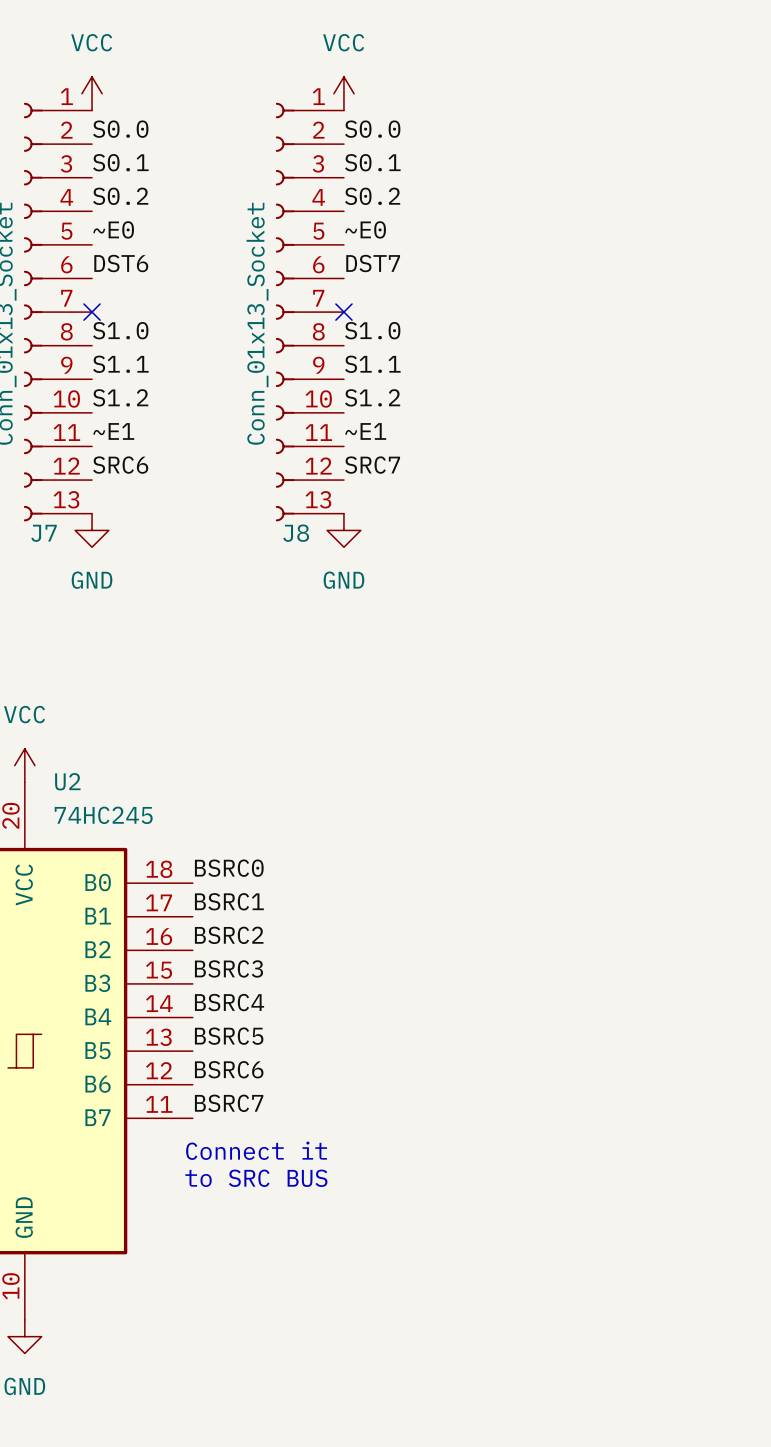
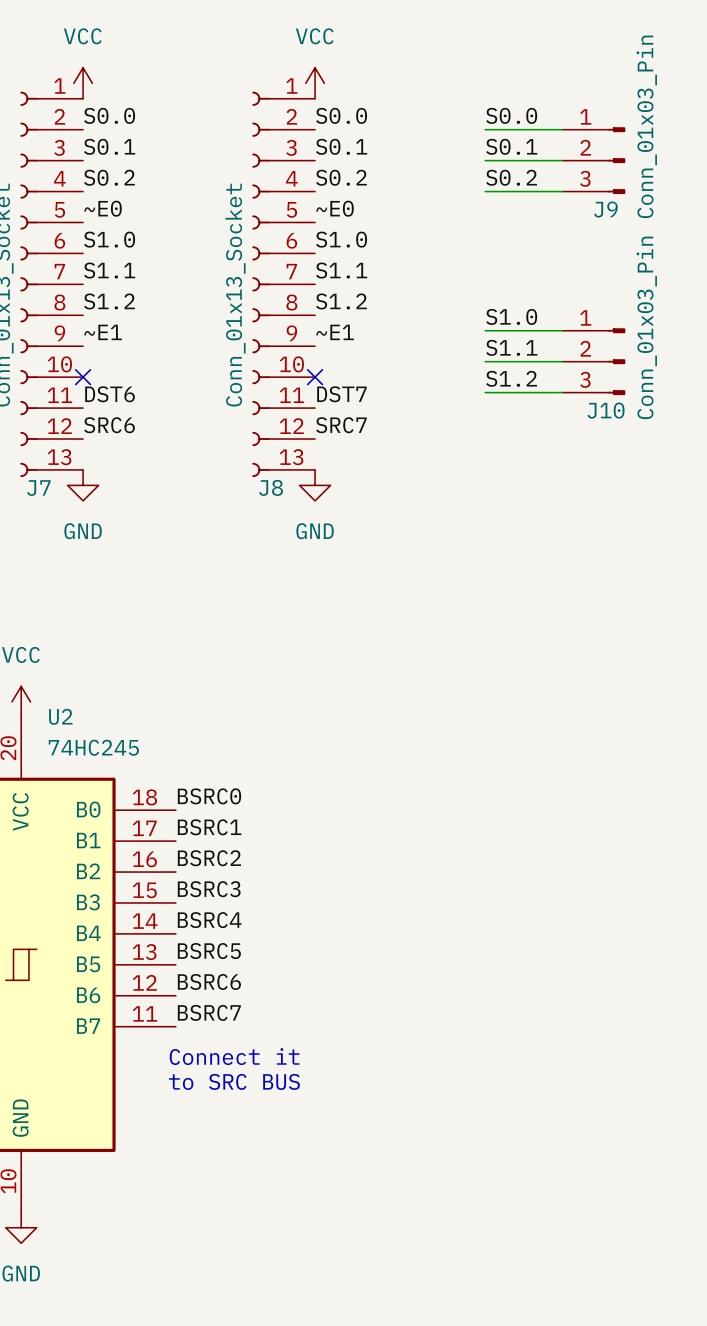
label: none -> S0.0 (511, 115)
wire: none -> (485, 129) (562, 129)
label: none -> S0.1 (511, 146)
wire: none -> (485, 160) (562, 160)
J9: none -> Conn_01x03_Pin (593, 160)
label: none -> S0.2 (511, 177)
wire: none -> (485, 191) (562, 191)
label: DST6 (121, 263) -> S1.0 (109, 239)
label: DST7 (373, 263) -> S1.0 (341, 239)
label: none -> S1.1 (109, 270)
label: none -> S1.1 (341, 270)
no-connect mark: (92, 312) -> none
no-connect mark: (343, 312) -> none
label: S1.0 (120, 330) -> S1.2 (109, 301)
label: S1.0 (372, 330) -> S1.2 (341, 301)
label: none -> S1.0 (511, 316)
wire: none -> (485, 330) (562, 330)
label: S1.1 (120, 364) -> ~E1 (103, 332)
label: S1.1 (372, 364) -> ~E1 (335, 332)
label: none -> S1.1 (511, 347)
wire: none -> (485, 361) (562, 361)
J10: none -> Conn_01x03_Pin (593, 361)
label: S1.2 (120, 397) -> none
label position: S1.2 (372, 397) -> S1.2 (511, 378)
no-connect mark: none -> (83, 377)
no-connect mark: none -> (315, 377)
wire: none -> (485, 392) (562, 392)
label: ~E1 (113, 431) -> DST6 (110, 394)
label: ~E1 (365, 431) -> DST7 (341, 394)

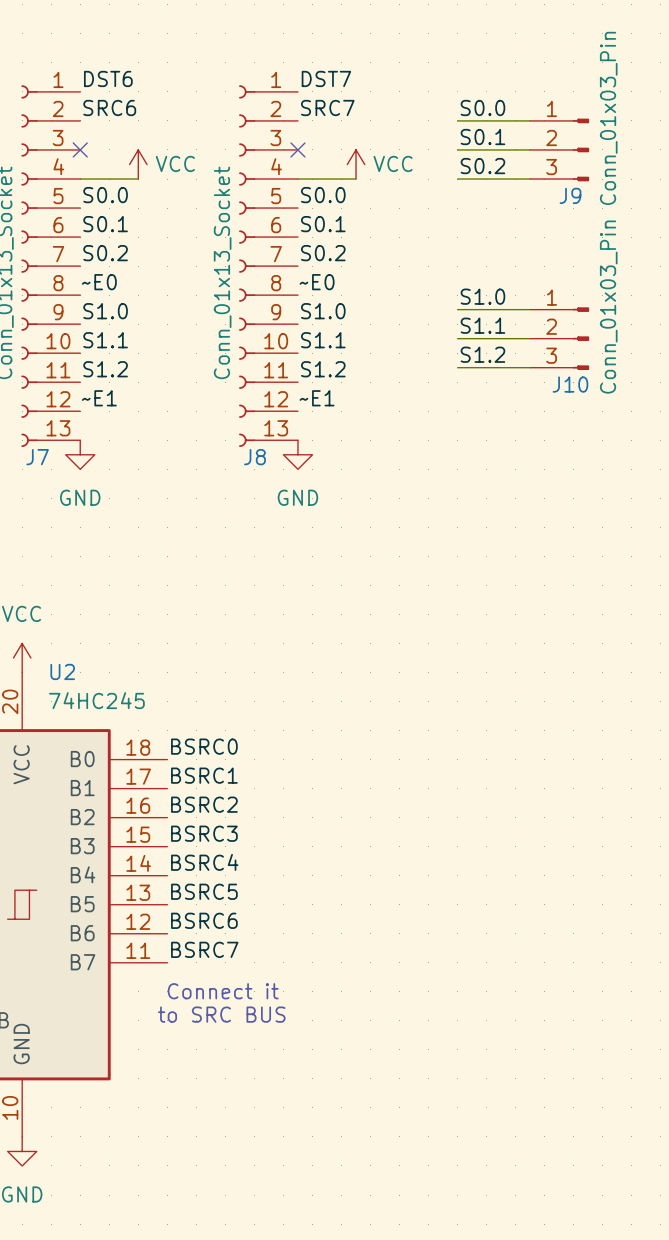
power symbol: VCC (83, 83) -> none
power symbol: VCC (315, 83) -> none
label: none -> DST6 (108, 78)
label: none -> DST7 (326, 78)
label: S0.0 (109, 115) -> SRC6 (109, 107)
label: S0.0 (341, 115) -> SRC7 (327, 107)
label: S0.1 (109, 146) -> none
label: S0.1 (341, 146) -> none
no-connect mark: none -> (80, 149)
no-connect mark: none -> (297, 149)
power symbol: none -> VCC (138, 164)
power symbol: none -> VCC (356, 164)
label: S0.2 (109, 177) -> none
label: S0.2 (341, 177) -> none
wire: none -> (80, 179) (138, 179)
wire: none -> (297, 179) (356, 179)
label: ~E0 (102, 208) -> S0.0 (105, 195)
label: ~E0 (334, 208) -> S0.0 (323, 195)
label: S1.0 (109, 239) -> S0.1 (105, 224)
label: S1.0 (341, 239) -> S0.1 (323, 224)
label: S1.1 (109, 270) -> S0.2 (105, 253)
label: S1.1 (341, 270) -> S0.2 (323, 253)
label: S1.2 (109, 301) -> ~E0 (99, 282)
label: S1.2 (341, 301) -> ~E0 (317, 282)
label: ~E1 (103, 332) -> S1.0 (105, 311)
label: ~E1 (335, 332) -> S1.0 (323, 311)
label: none -> S1.1 (105, 340)
label: none -> S1.1 (323, 340)
no-connect mark: (83, 377) -> none
no-connect mark: (315, 377) -> none
label: DST6 (110, 394) -> S1.2 (105, 369)
label: DST7 (341, 394) -> S1.2 (323, 369)
label: SRC6 (109, 425) -> ~E1 (99, 398)
label: SRC7 (341, 425) -> ~E1 (317, 398)

